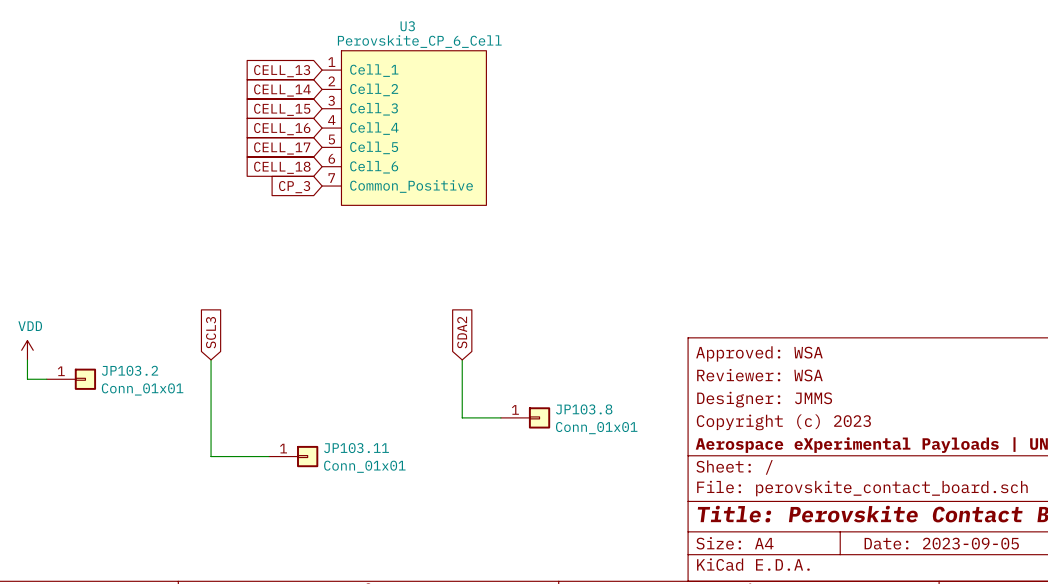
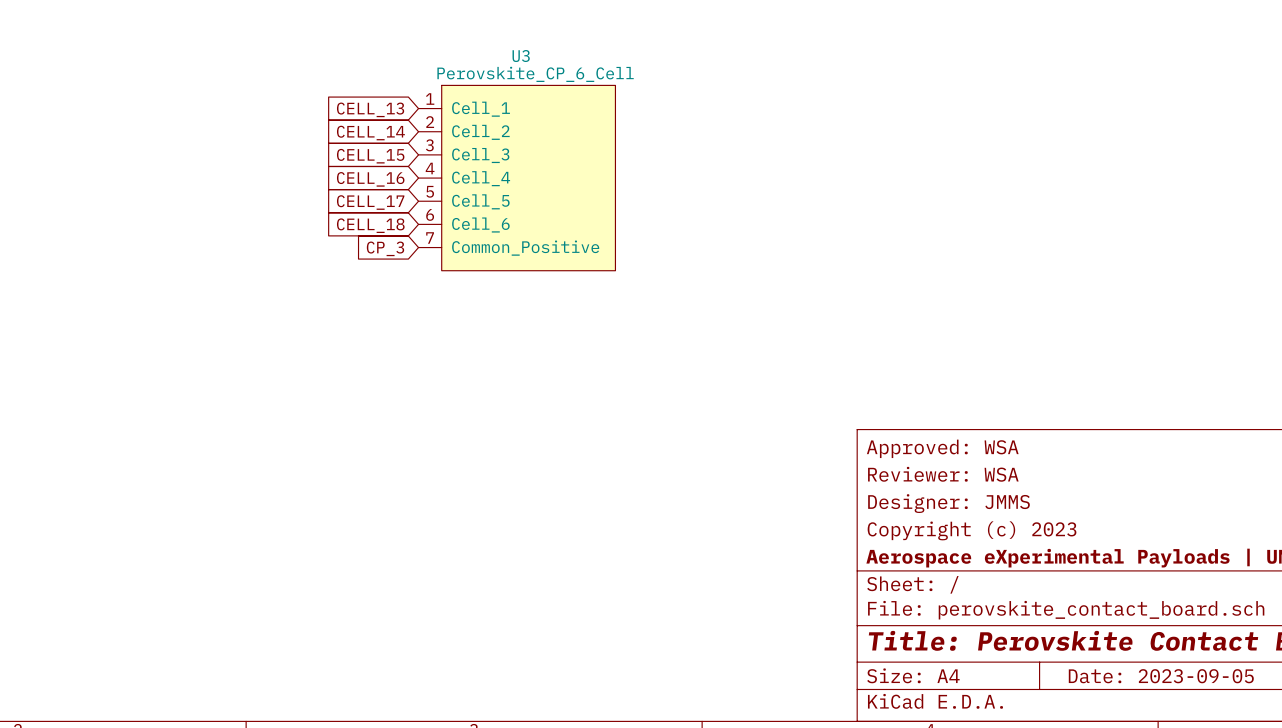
global label: SCL3 (211, 332) -> none
global label: SDA2 (462, 332) -> none
power symbol: VDD (27, 350) -> none
wire: (27, 359) (27, 379) (46, 379) -> none
wire: (211, 359) (211, 456) (269, 456) -> none
wire: (462, 359) (462, 417) (500, 417) -> none
JP103.2: Conn_01x01 (71, 379) -> none
JP103.8: Conn_01x01 (525, 417) -> none
JP103.11: Conn_01x01 (293, 456) -> none

